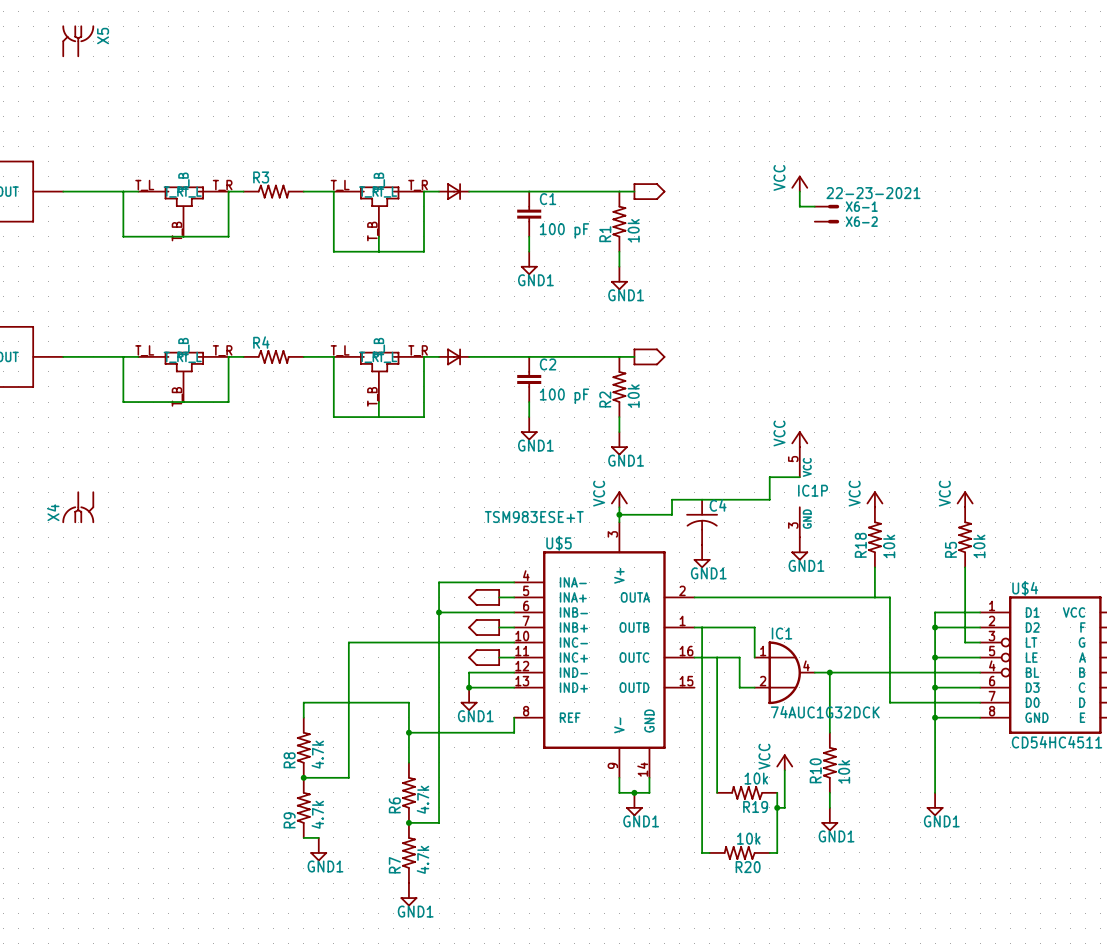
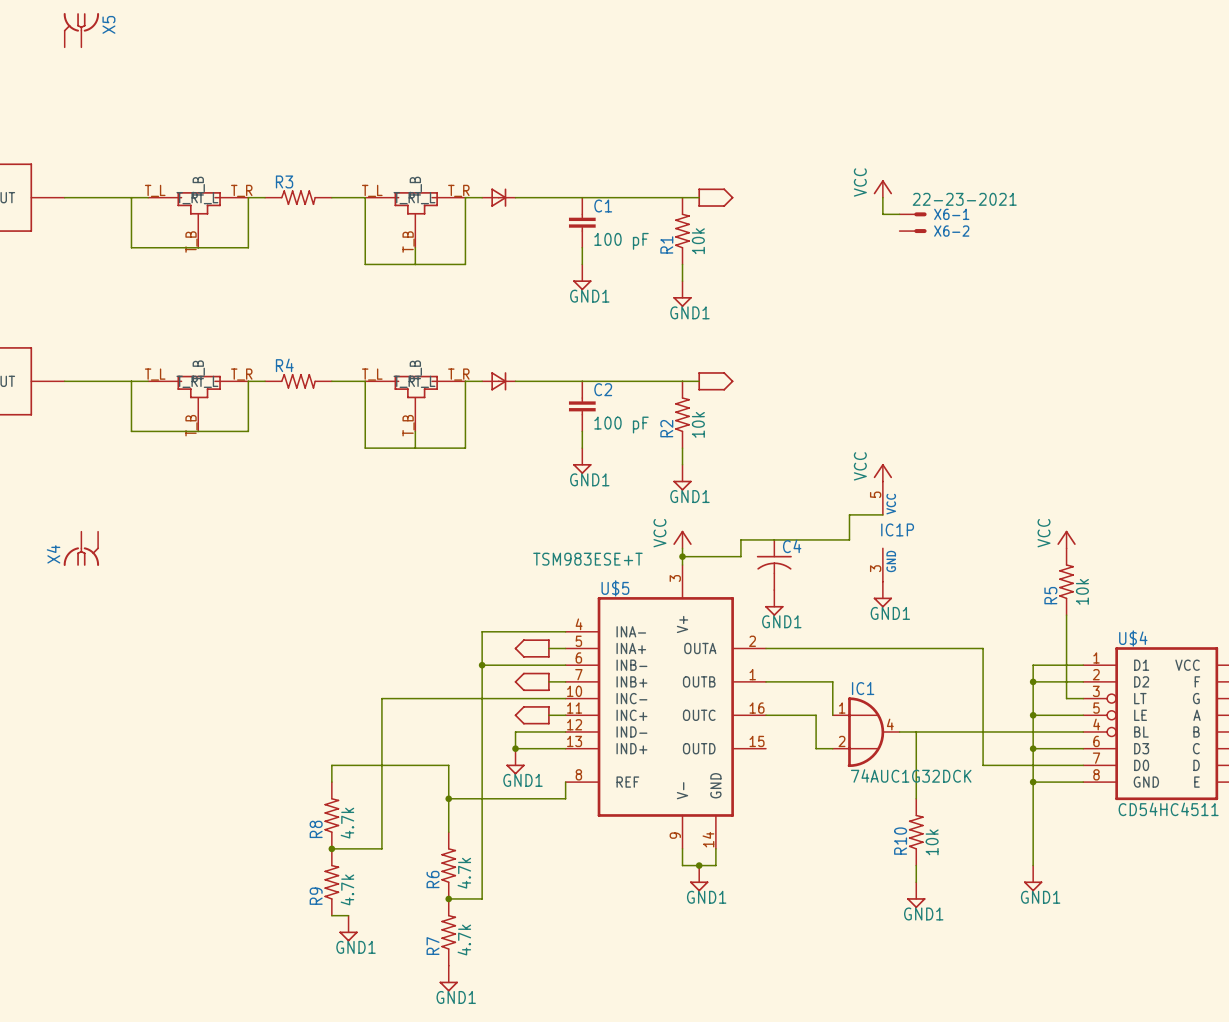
power symbol: VCC (874, 499) -> none
R18: 10k (874, 537) -> none
wire: (874, 567) (874, 597) -> none
wire: (702, 627) (702, 852) (709, 852) -> none
wire: (717, 657) (717, 792) -> none
junction: (829, 672) -> none
power symbol: VCC (784, 762) -> none
wire: (784, 770) (784, 807) (777, 807) -> none
R19: 10k (747, 792) -> none
wire: (777, 792) (777, 852) (769, 852) -> none
junction: (777, 807) -> none
R20: 10k (739, 852) -> none

